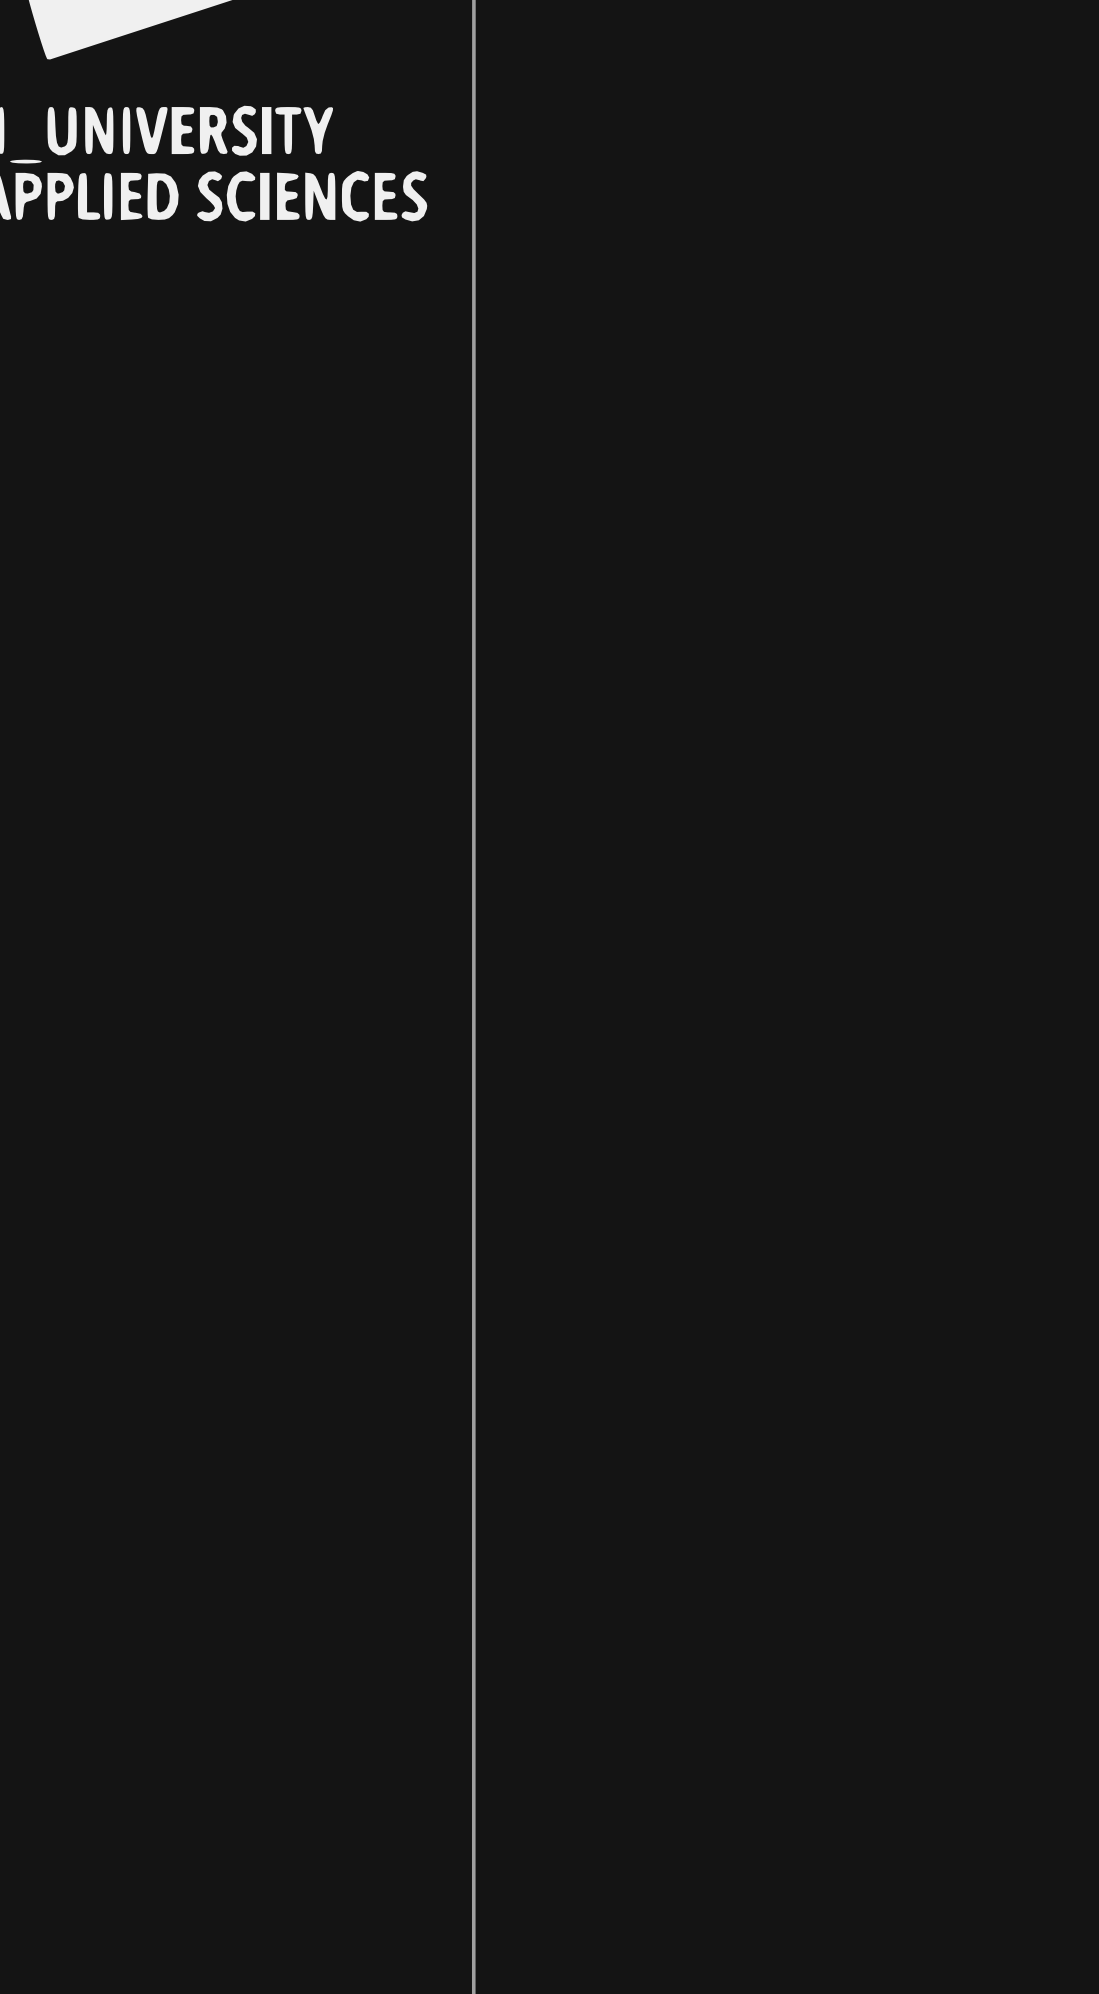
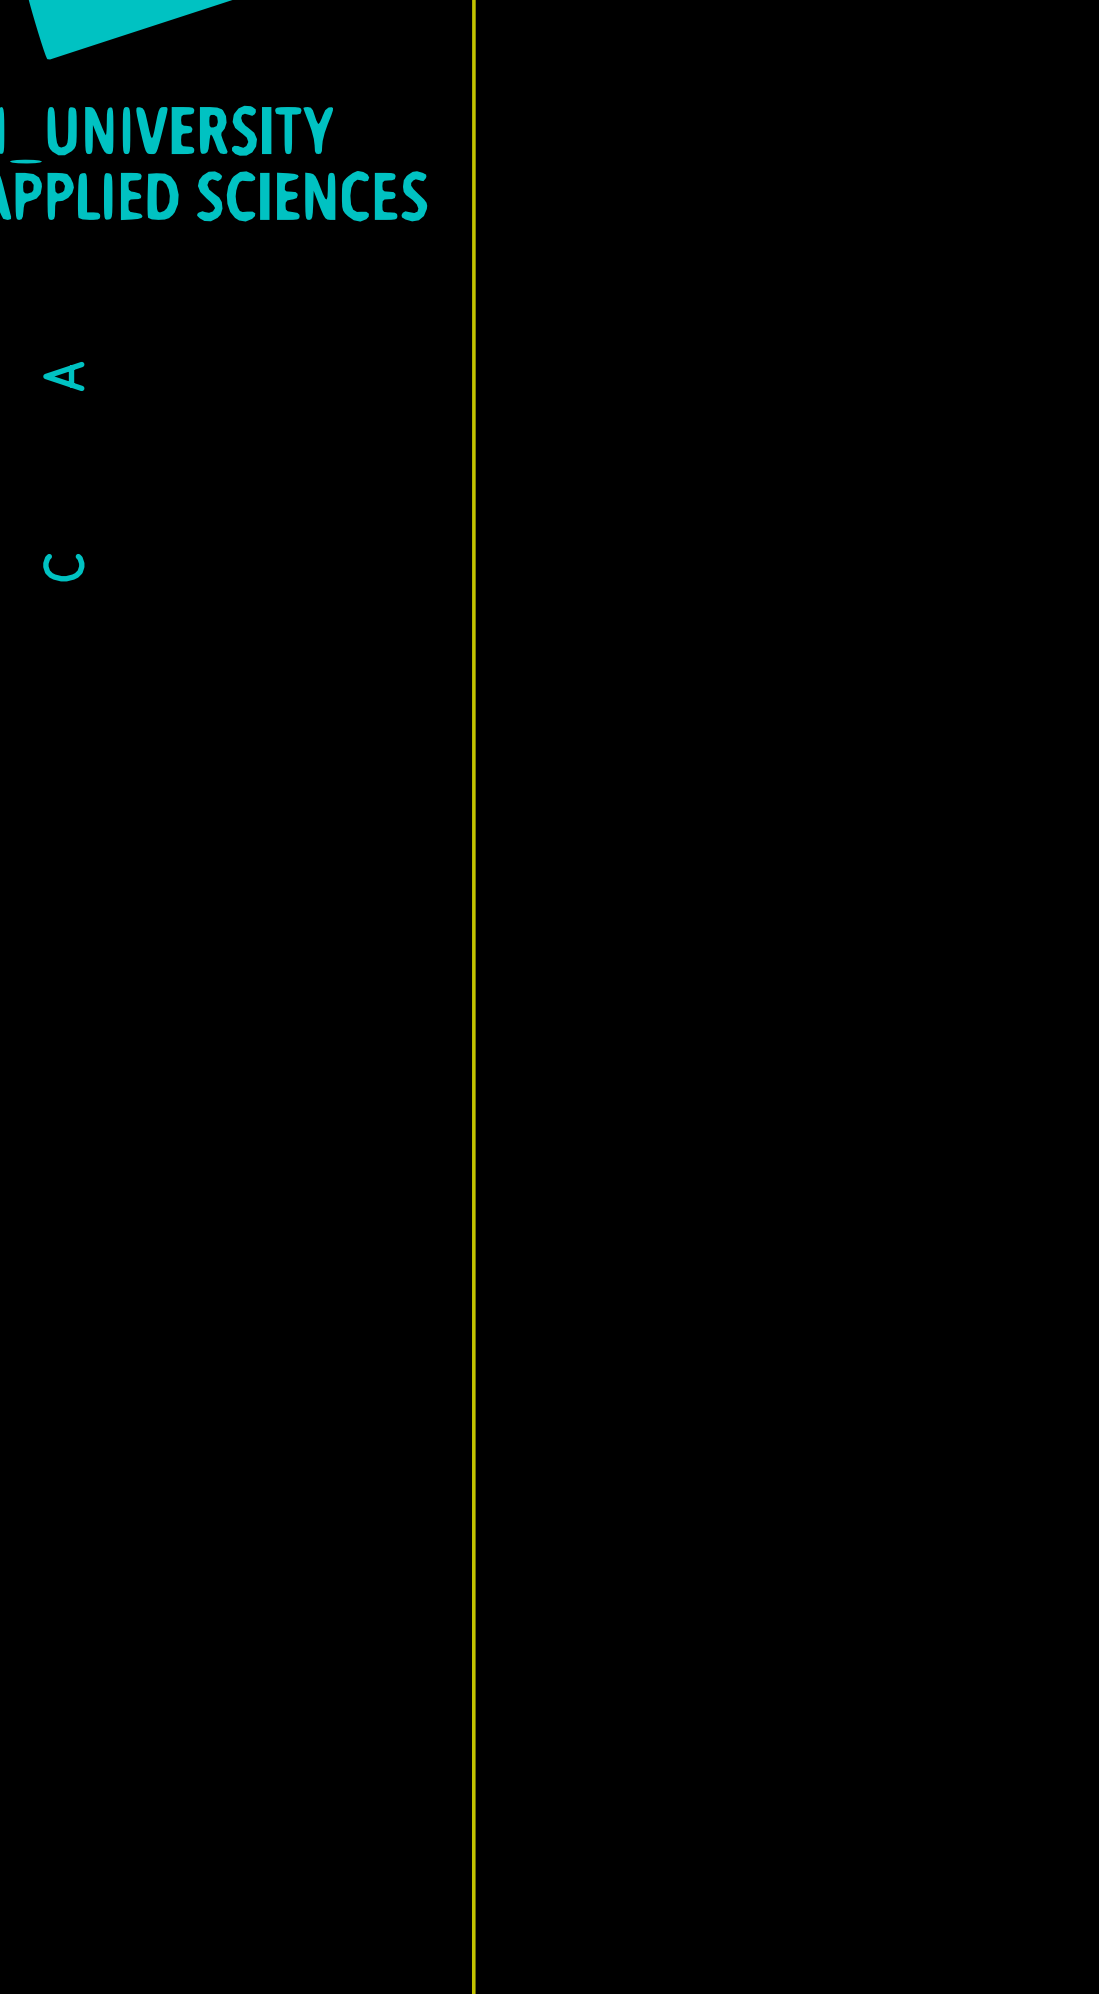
text: none -> A (63, 376)
text: none -> C (63, 567)

